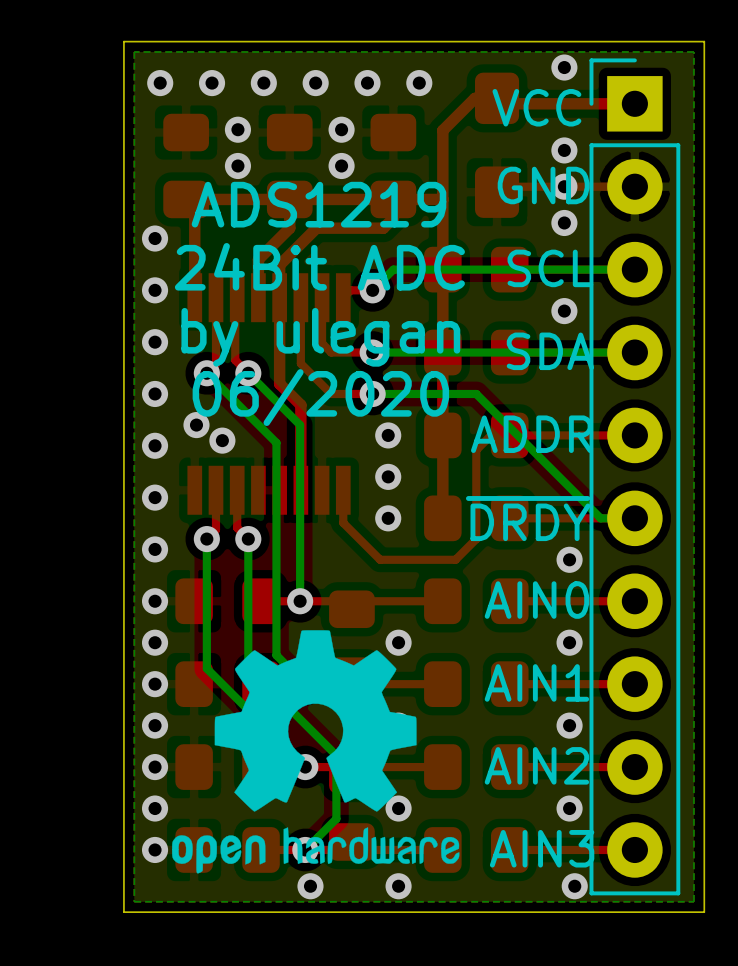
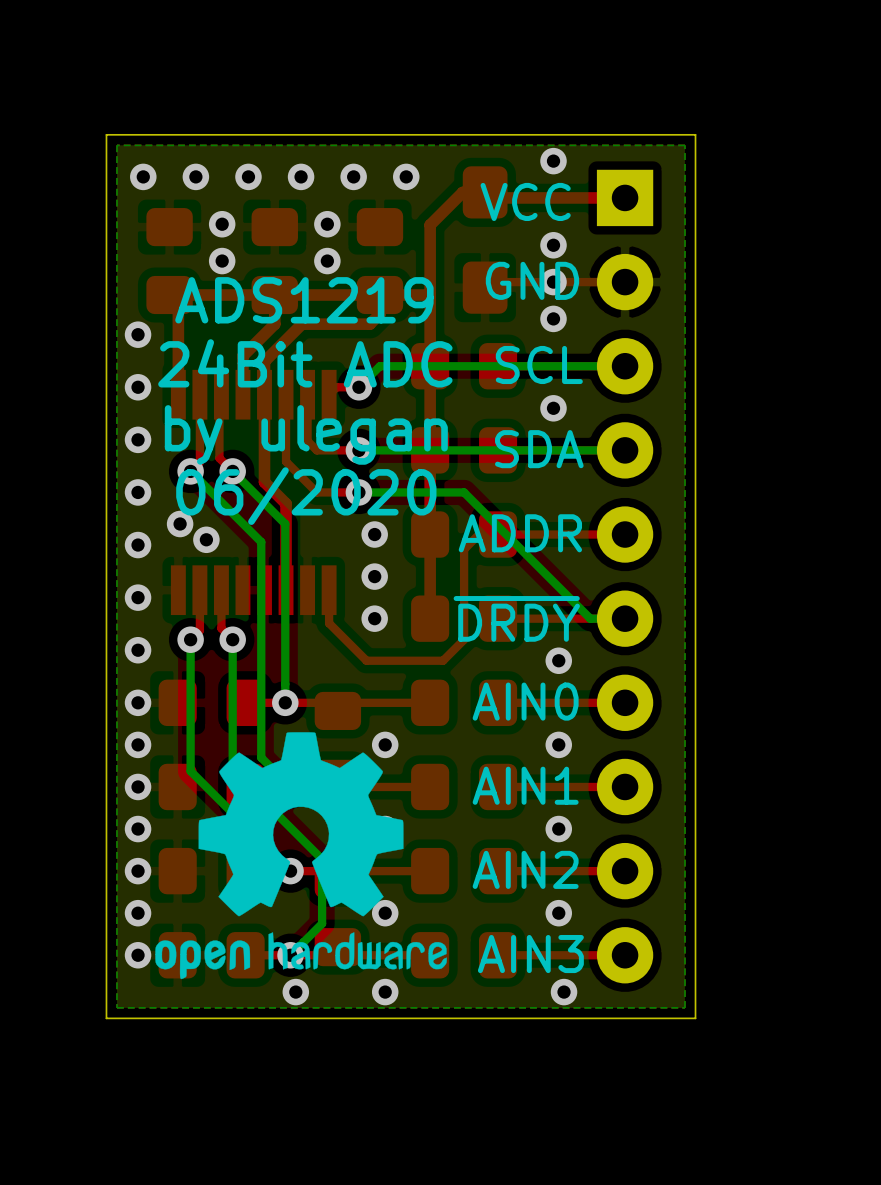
part side: bottom (634, 476) -> top (625, 576)

